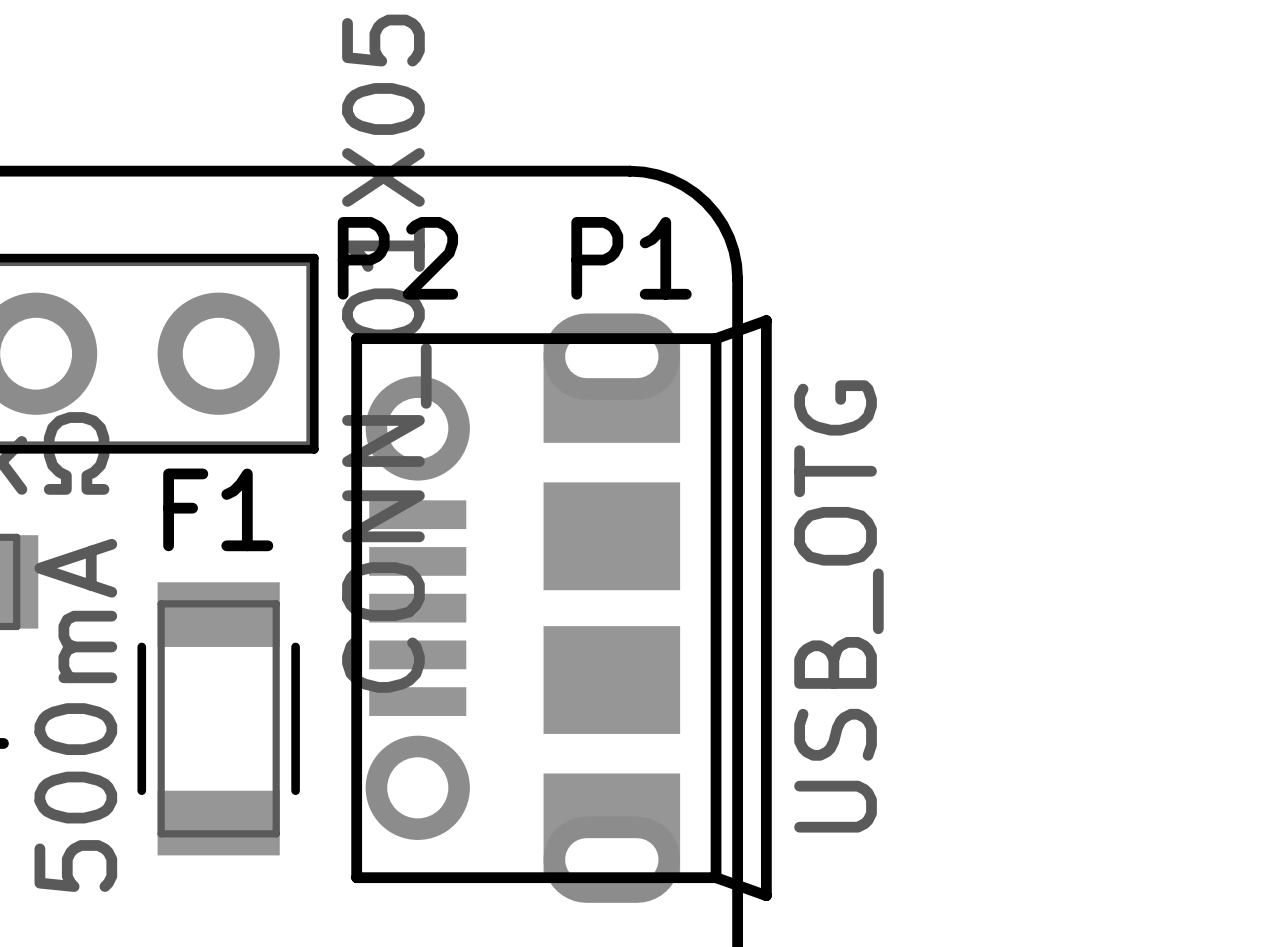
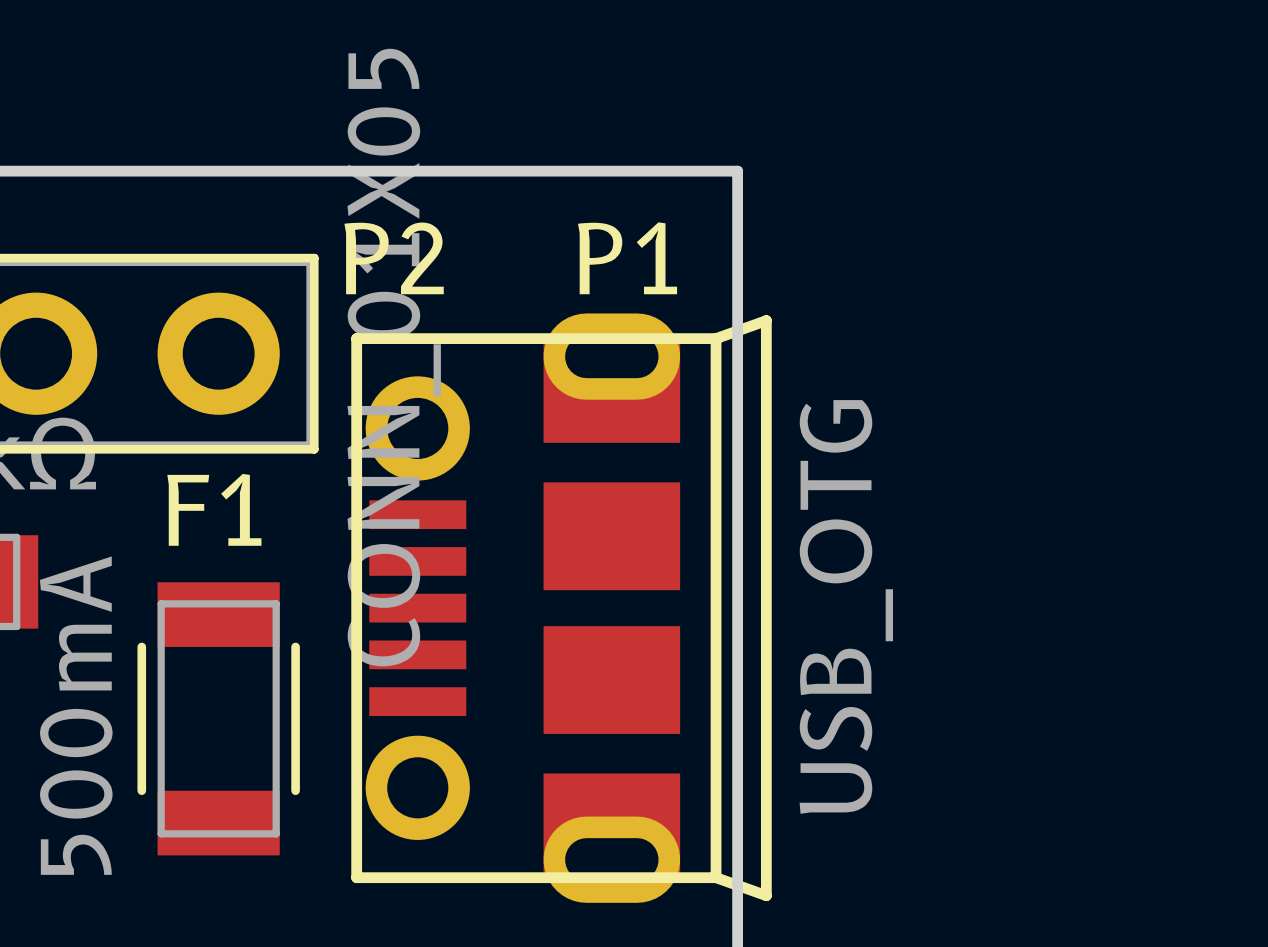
board edge: (629, 171) (643, 172) (671, 179) (695, 193) (706, 202) (715, 213) (729, 237) (736, 264) (737, 278) -> (629, 171) (737, 171) (737, 278)

